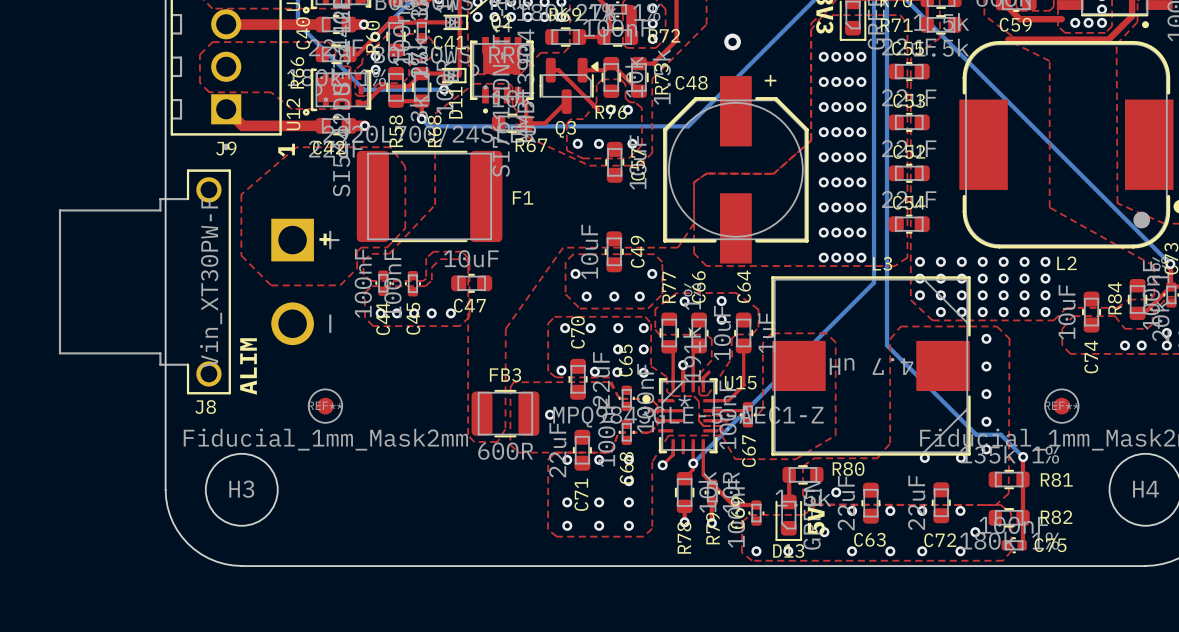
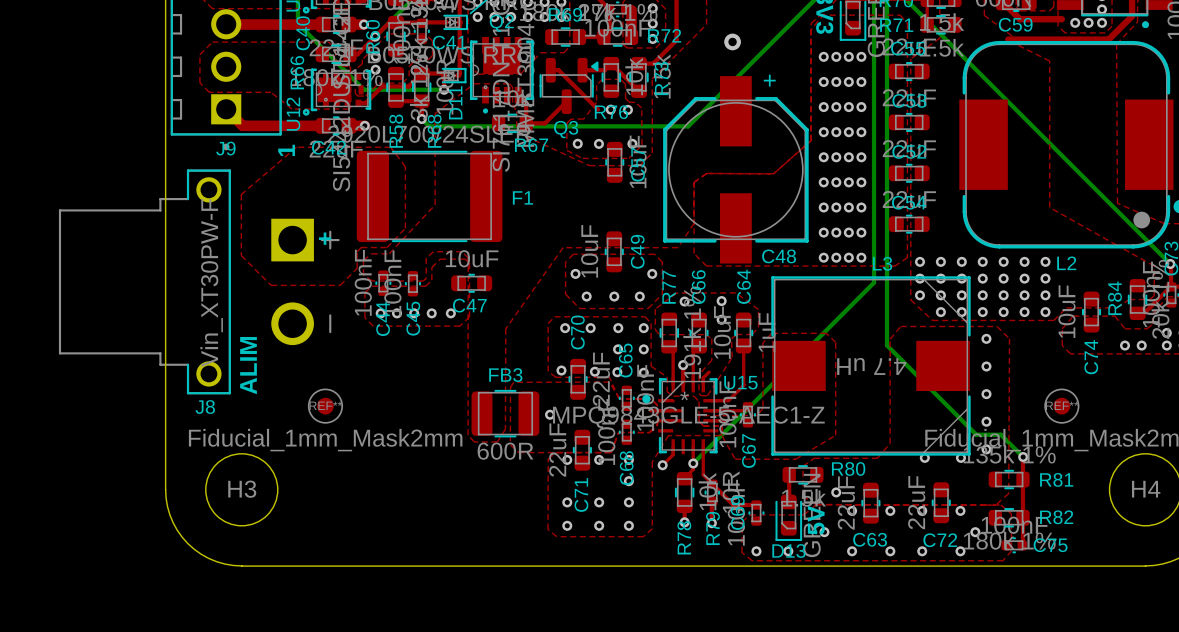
C48 name position: C48 (691, 82) -> C48 (779, 256)

